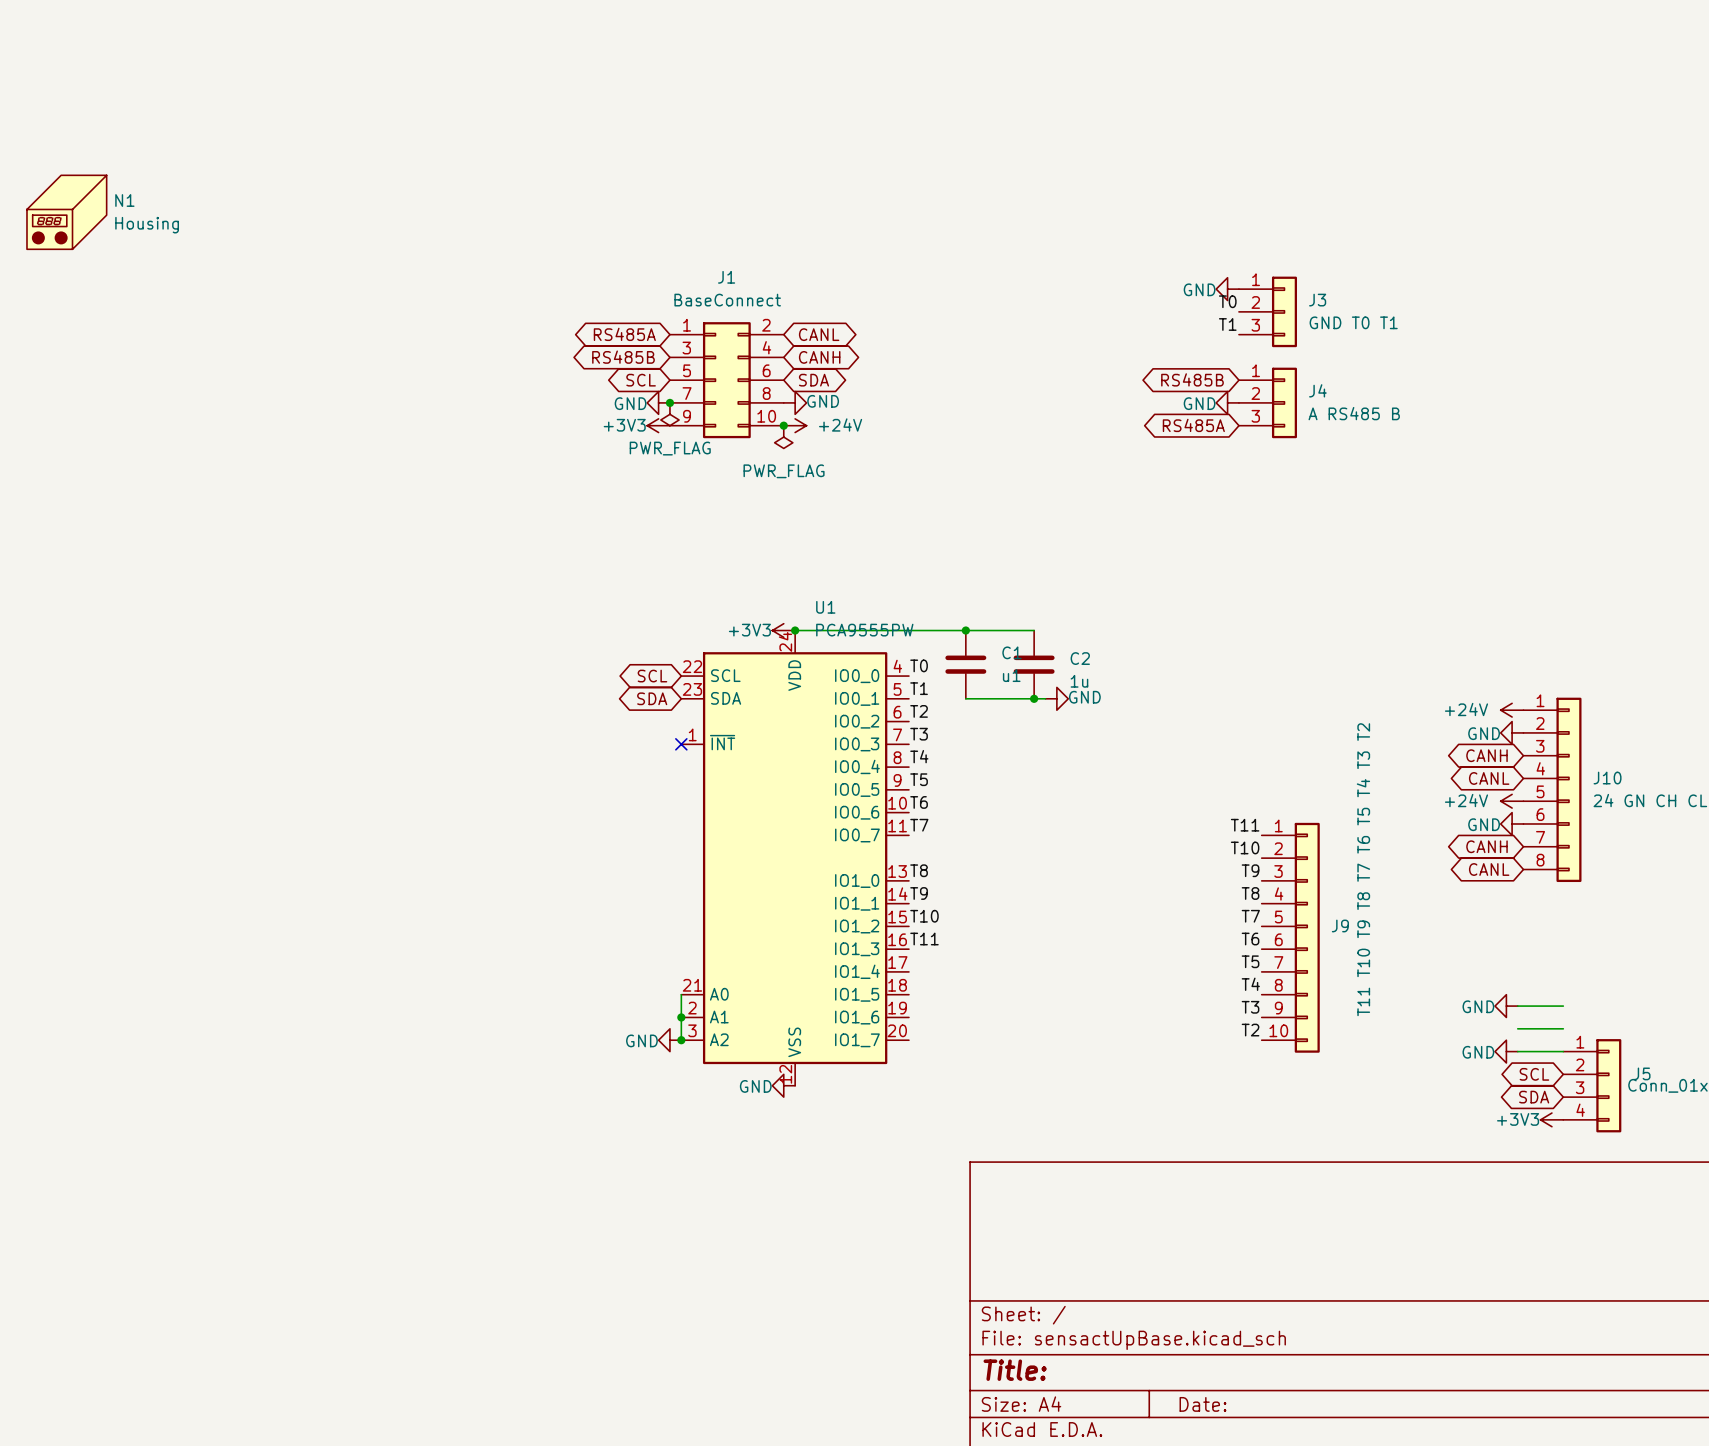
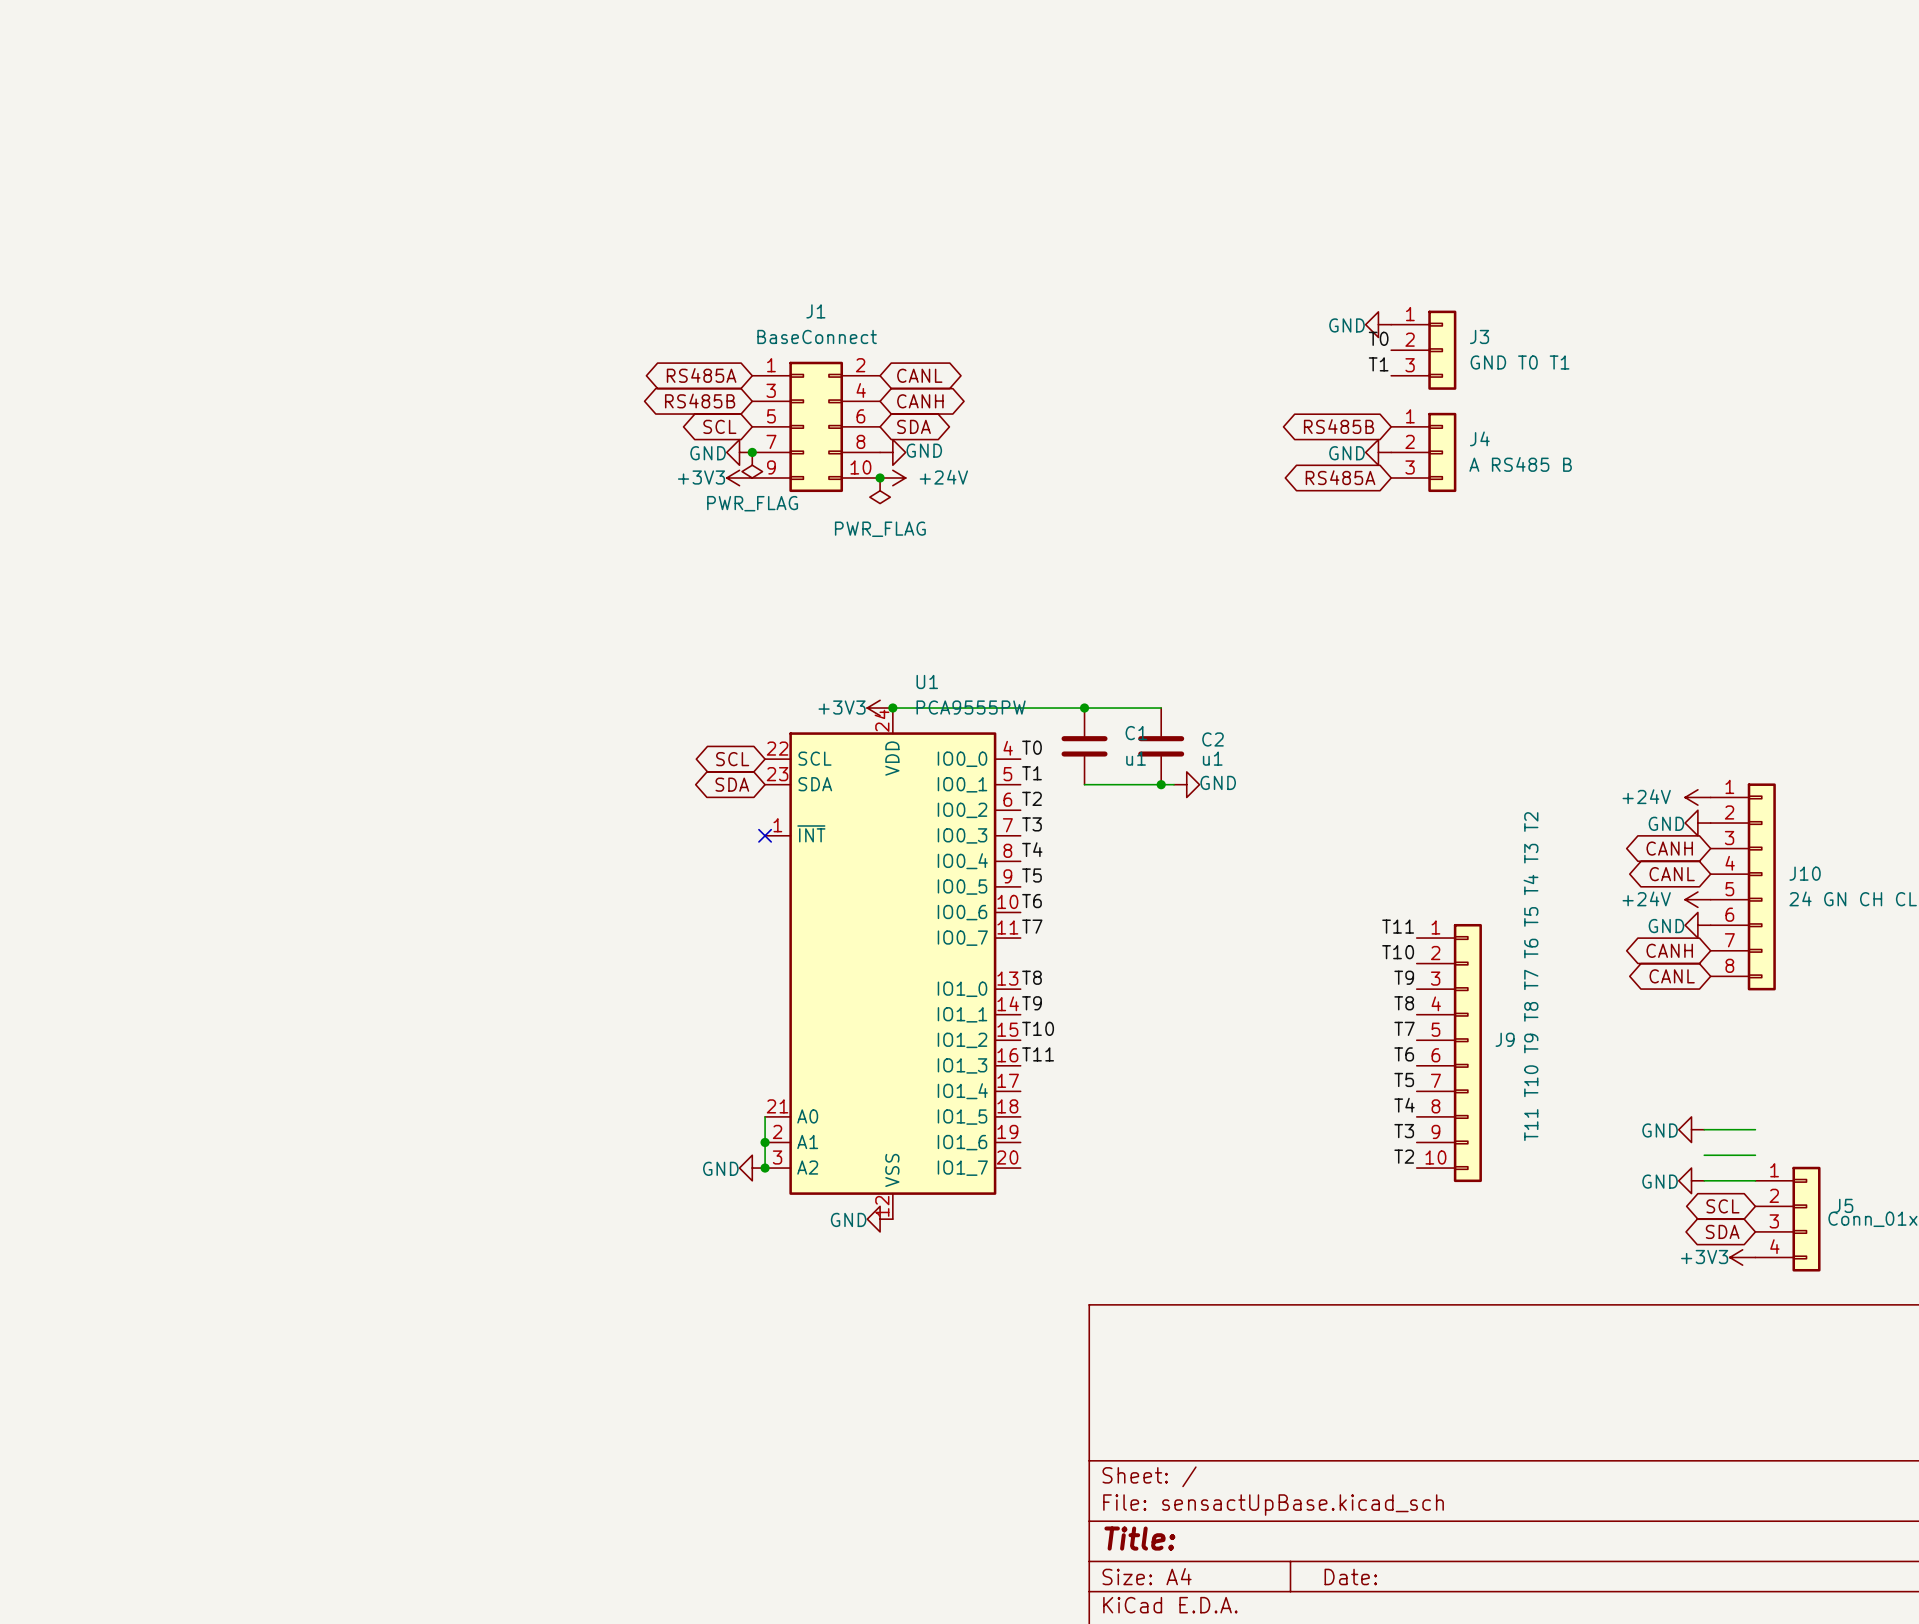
N1: Housing (66, 212) -> none
C2 value: 1u (1079, 681) -> u1 (1212, 758)

